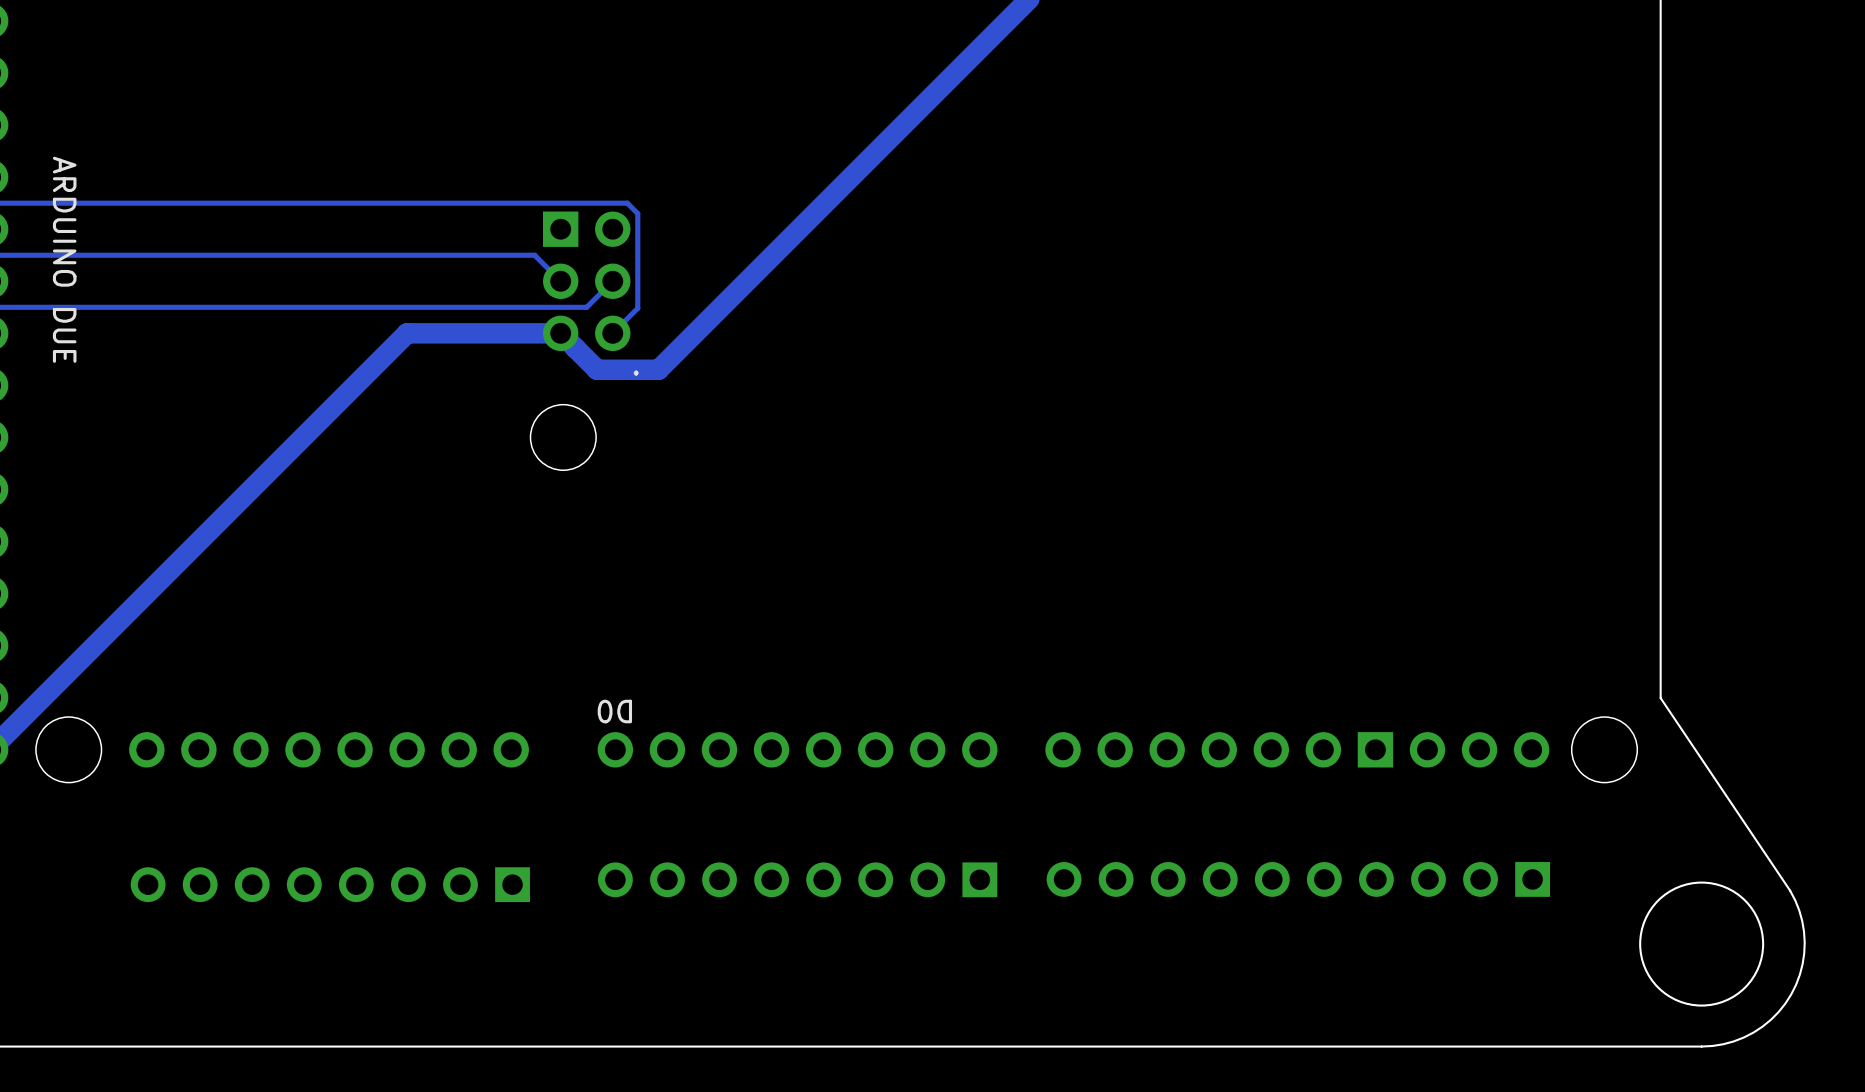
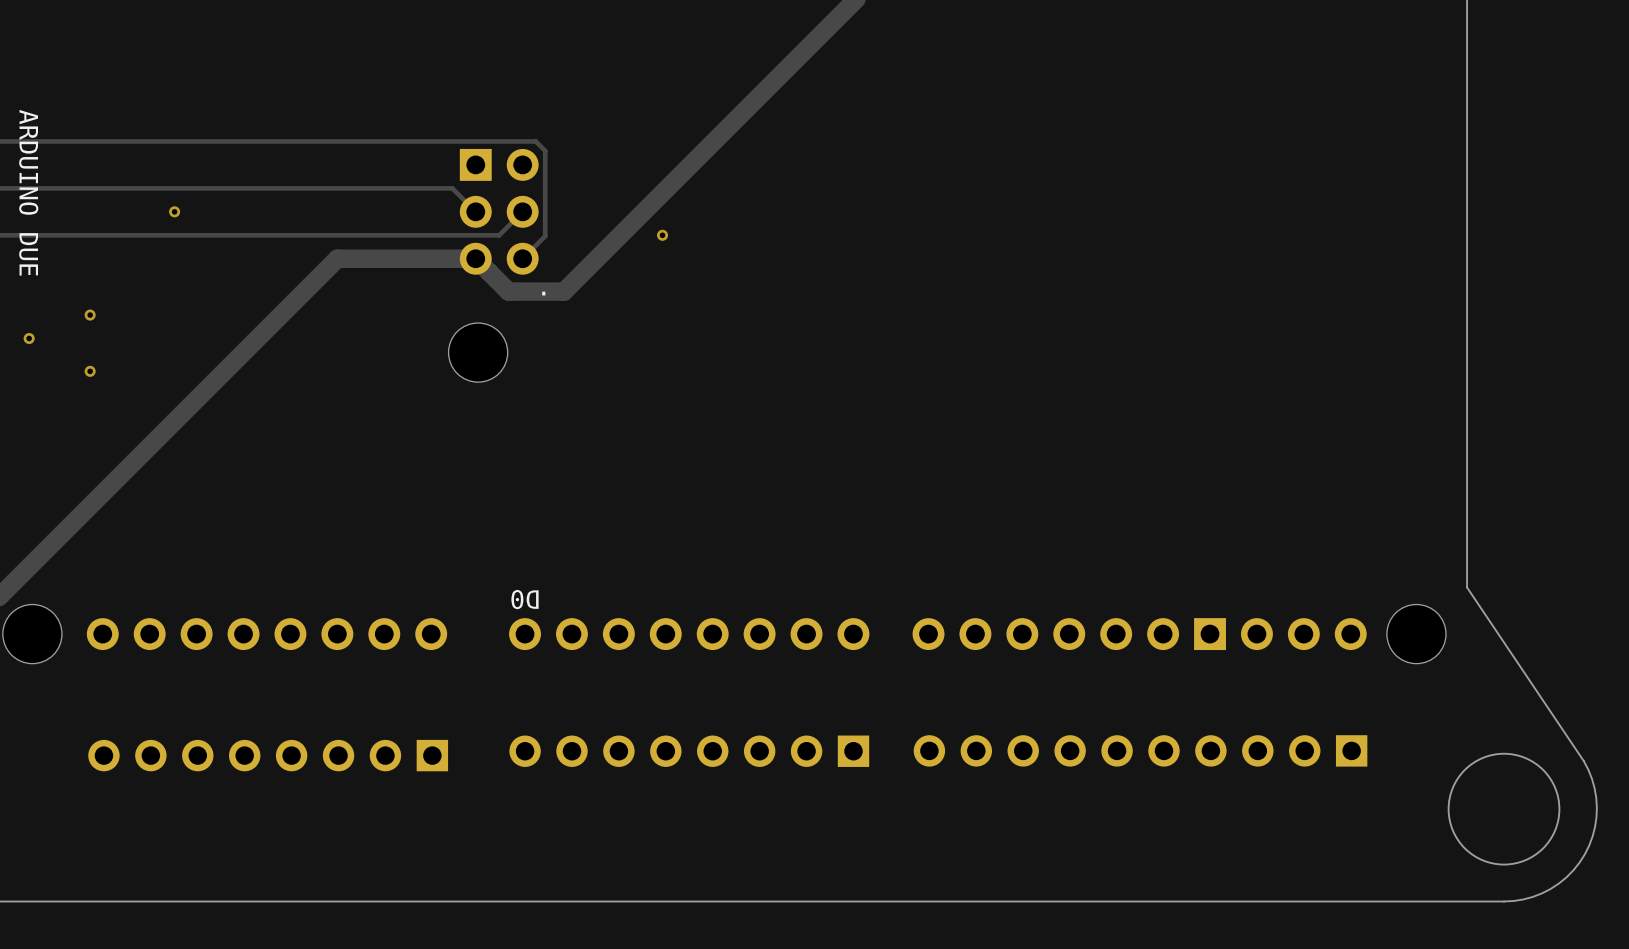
via: none -> (174, 211)
via: none -> (662, 235)
via: none -> (90, 315)
via: none -> (29, 338)
via: none -> (90, 371)

